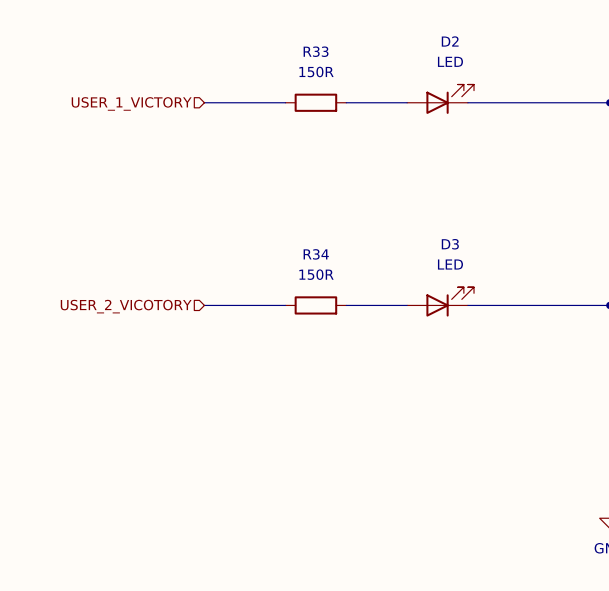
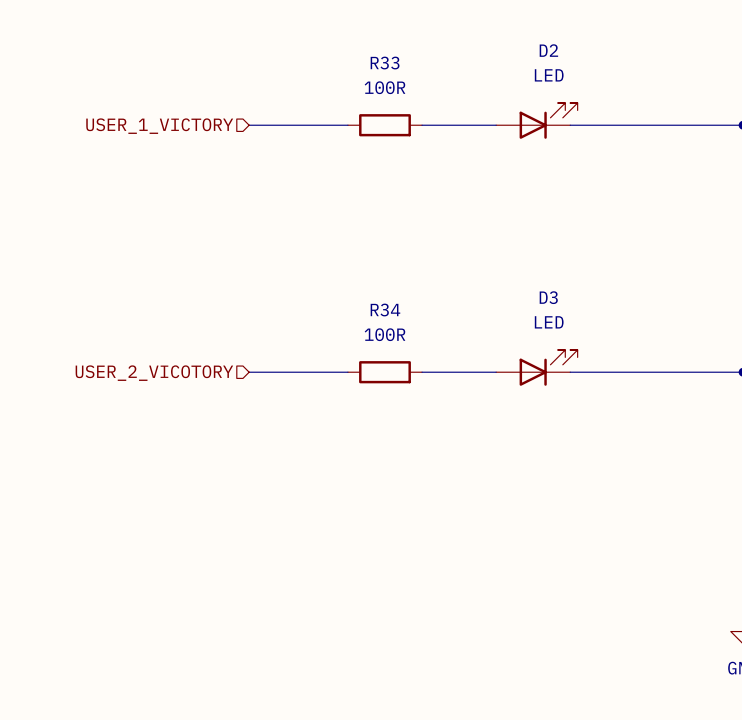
R33 value: 150R (316, 71) -> 100R (385, 87)
R34 value: 150R (316, 274) -> 100R (385, 334)

